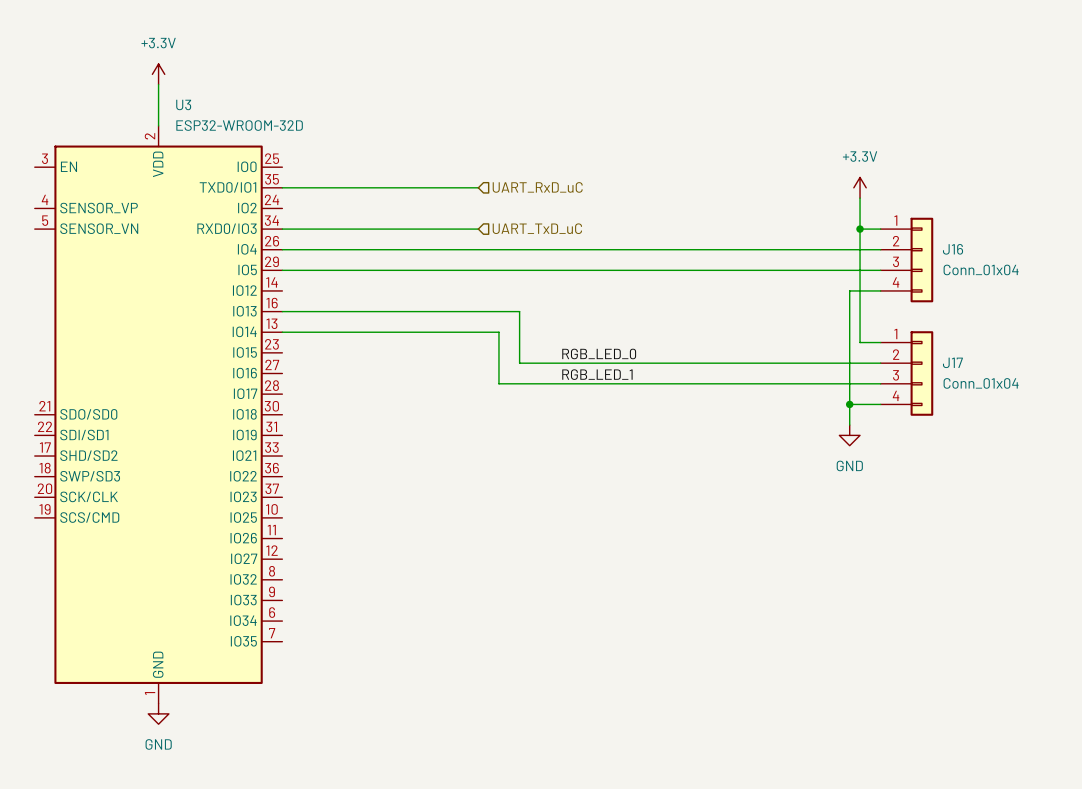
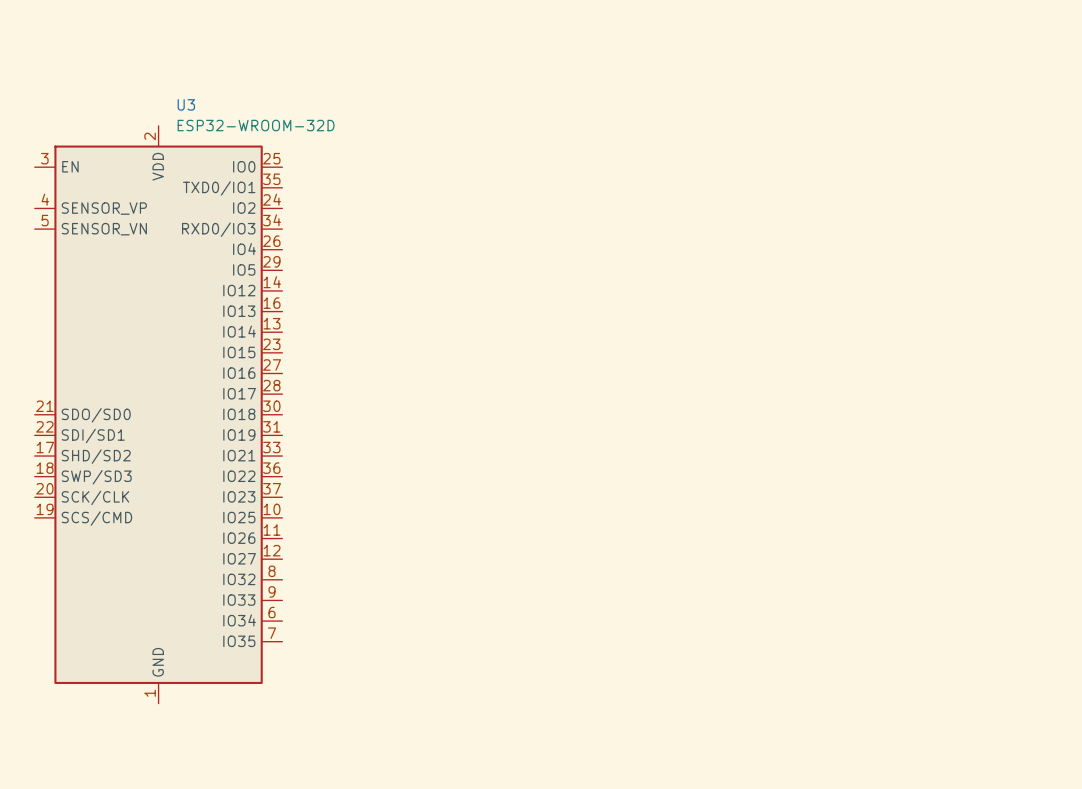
power symbol: +3.3V (158, 74) -> none
wire: (158, 84) (158, 125) -> none
wire: (282, 187) (478, 187) -> none
hierarchical label: UART_RxD_uC (537, 187) -> none
power symbol: +3.3V (860, 187) -> none
wire: (860, 198) (860, 342) (880, 342) -> none
hierarchical label: UART_TxD_uC (537, 228) -> none
wire: (282, 229) (478, 229) -> none
wire: (860, 229) (880, 229) -> none
junction: (860, 229) -> none
wire: (282, 249) (880, 249) -> none
J16: Conn_01x04 (906, 260) -> none
wire: (282, 270) (880, 270) -> none
wire: (880, 290) (849, 290) (849, 425) -> none
wire: (282, 311) (519, 311) (519, 363) (880, 363) -> none
wire: (282, 332) (498, 332) (498, 383) (880, 383) -> none
label: RGB_LED_0 (599, 353) -> none
J17: Conn_01x04 (906, 373) -> none
label: RGB_LED_1 (597, 374) -> none
wire: (849, 404) (880, 404) -> none
junction: (849, 404) -> none
power symbol: GND (849, 435) -> none
power symbol: GND (158, 713) -> none

